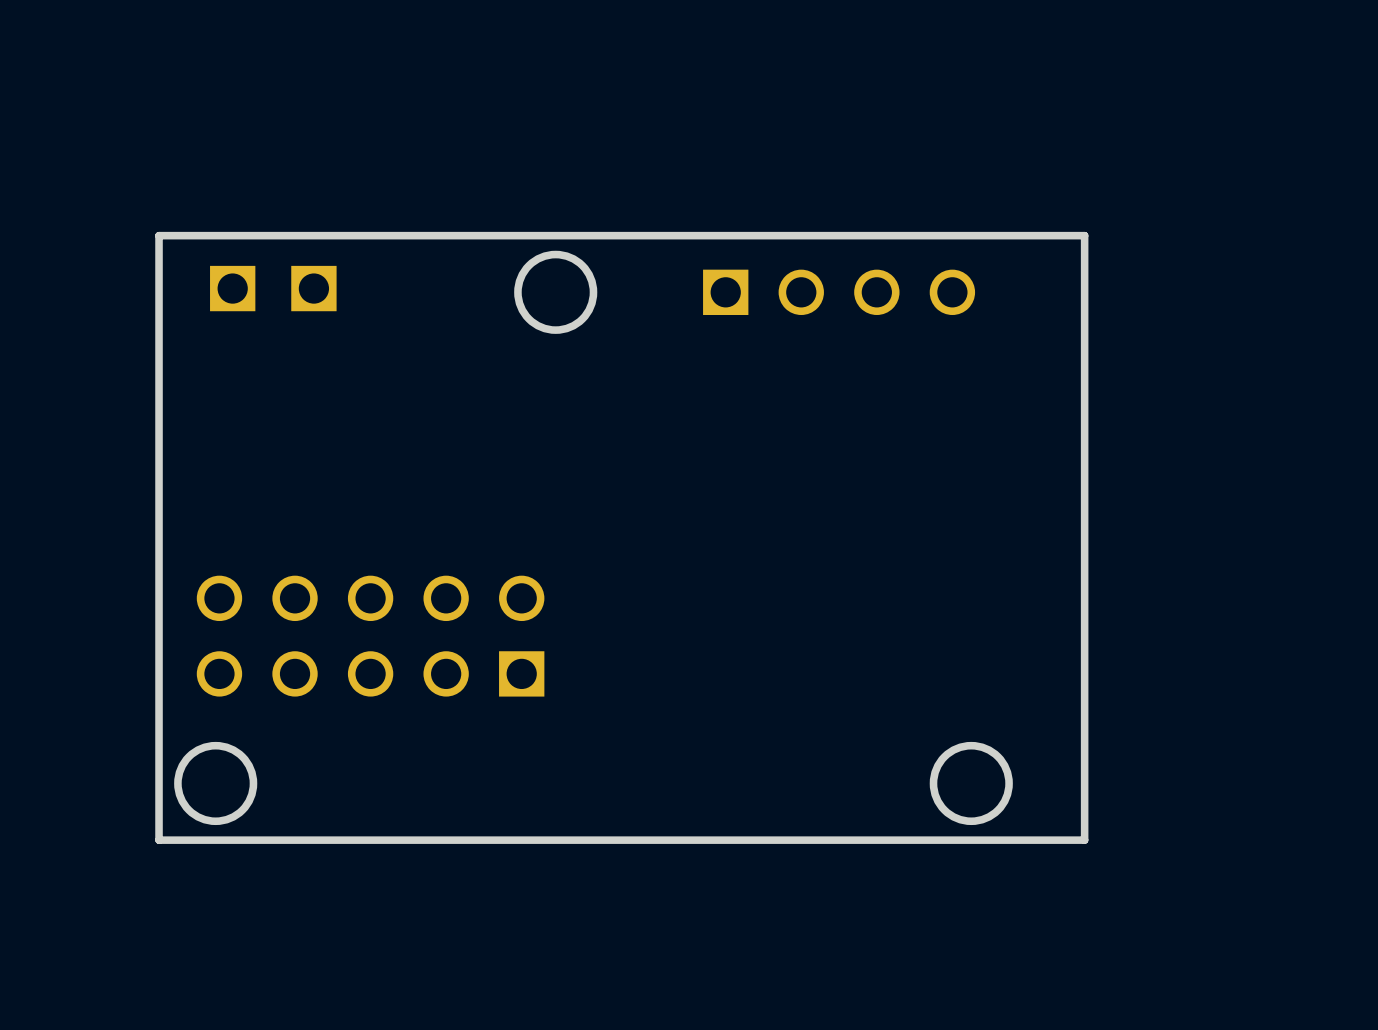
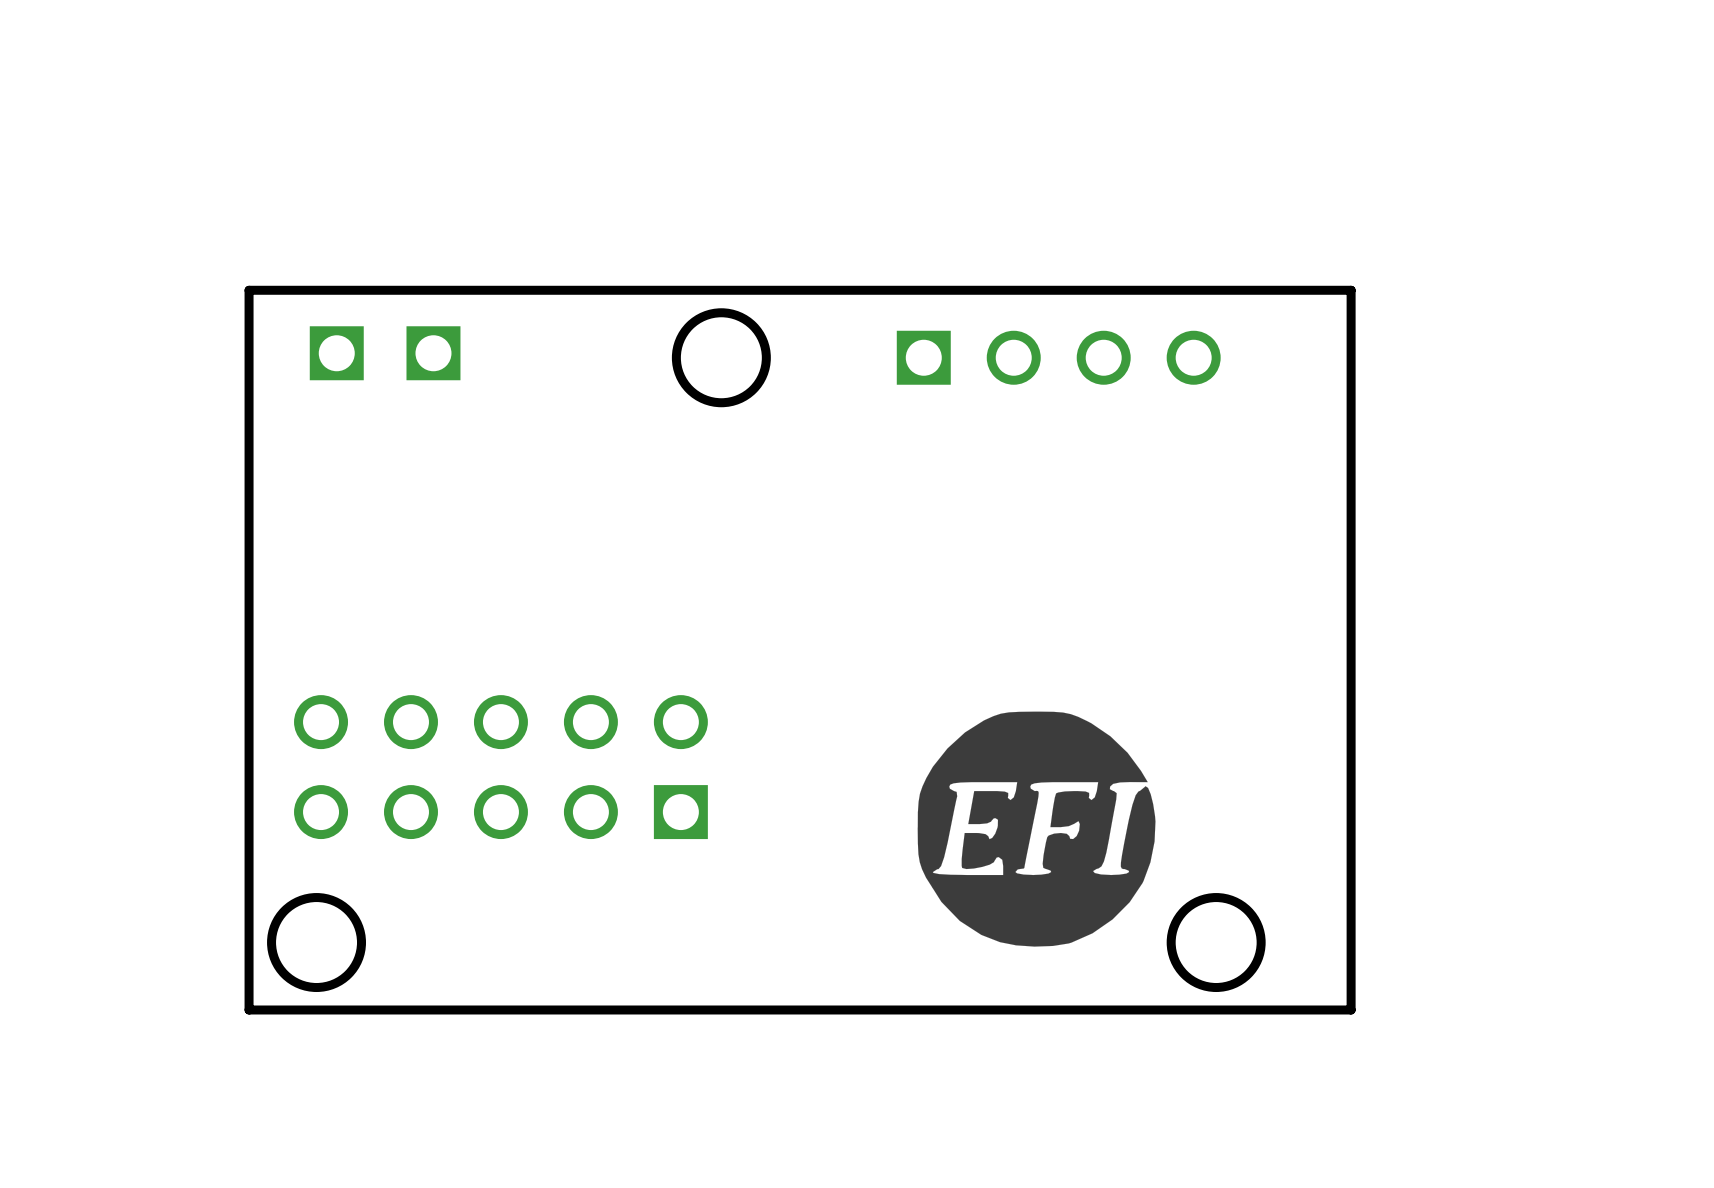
drawing: none -> [917, 711, 1156, 947]

